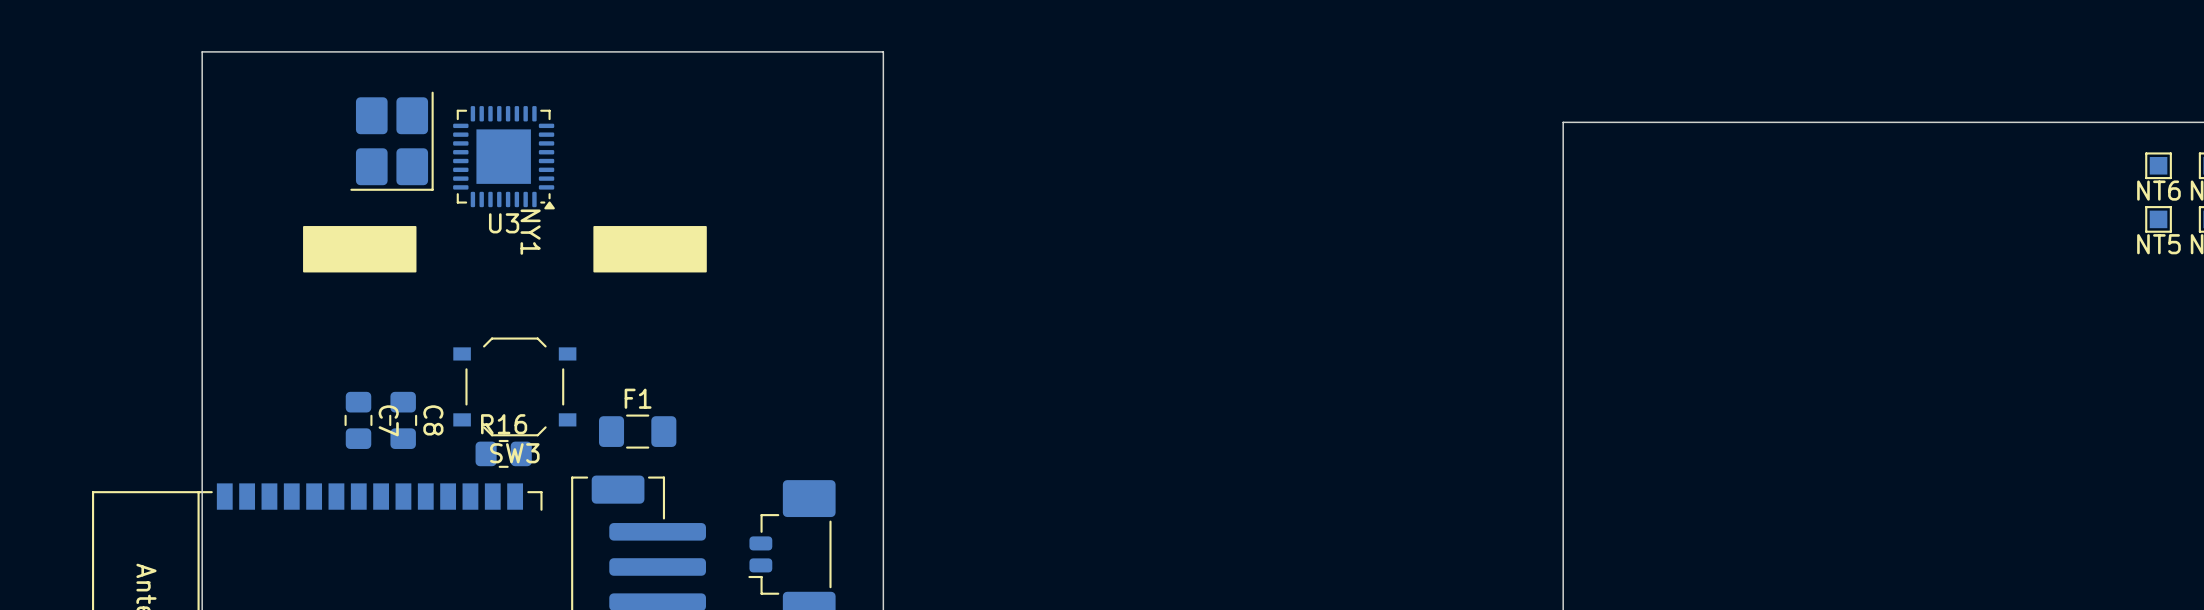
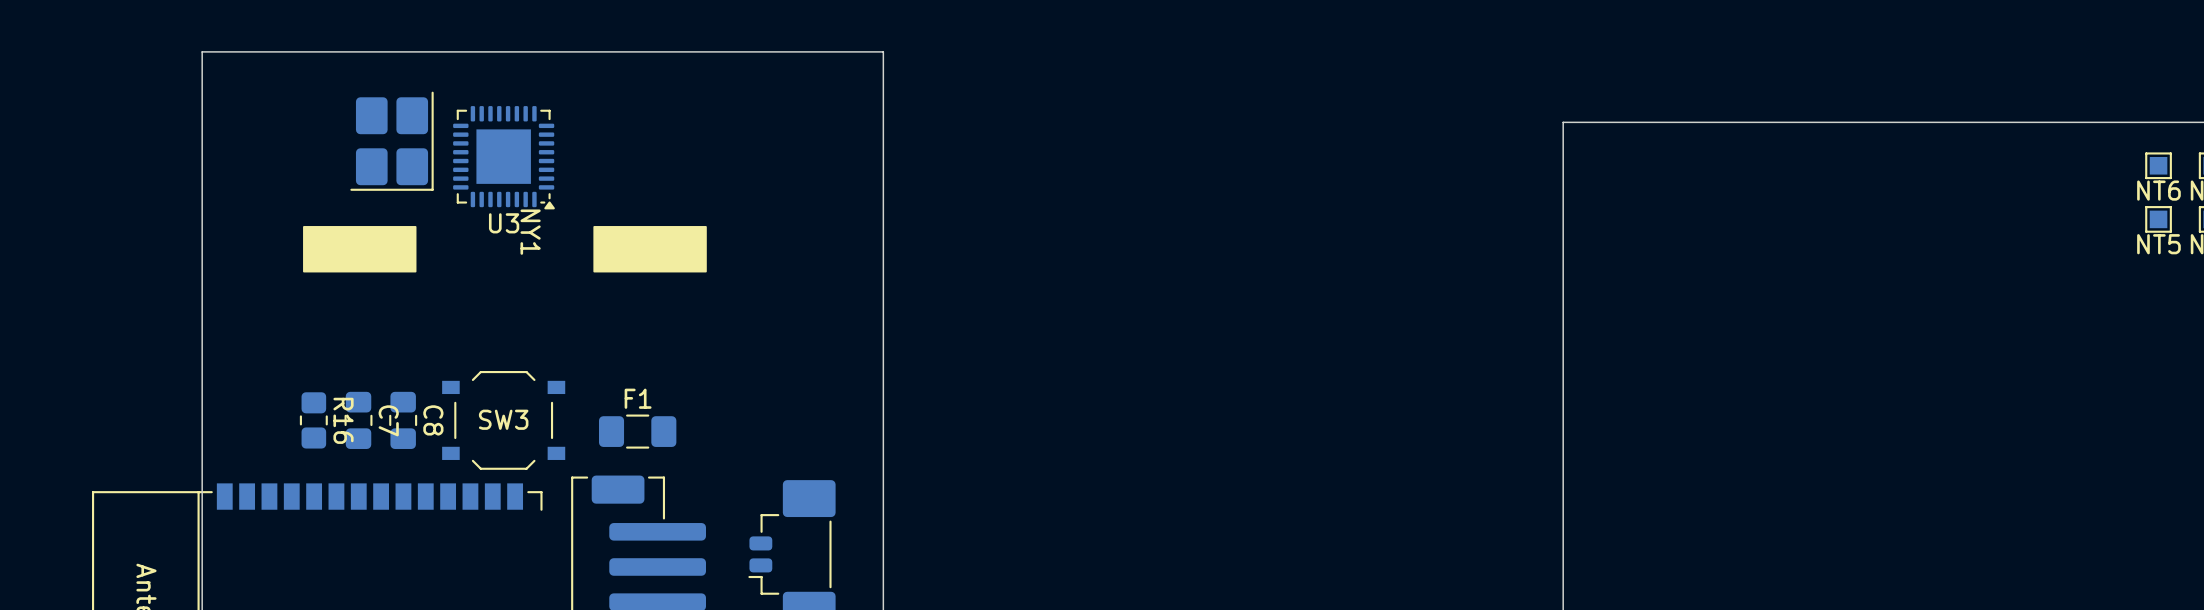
SW3 position: (514, 386) -> (503, 420)
R16 rotation: 0° (503, 453) -> 90° clockwise (313, 420)
R16 position: (503, 453) -> (313, 420)
SW3 name position: SW3 (514, 453) -> SW3 (503, 419)

